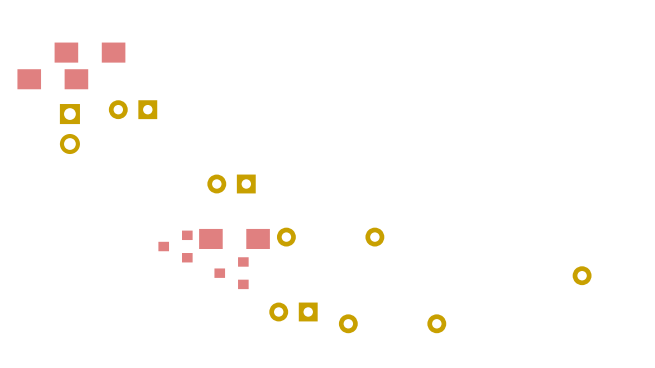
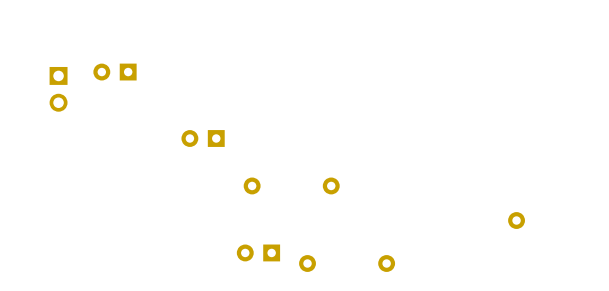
part: (89, 52) -> none
part: (52, 79) -> none
part: (234, 238) -> none
part: (175, 246) -> none
part: (231, 273) -> none

